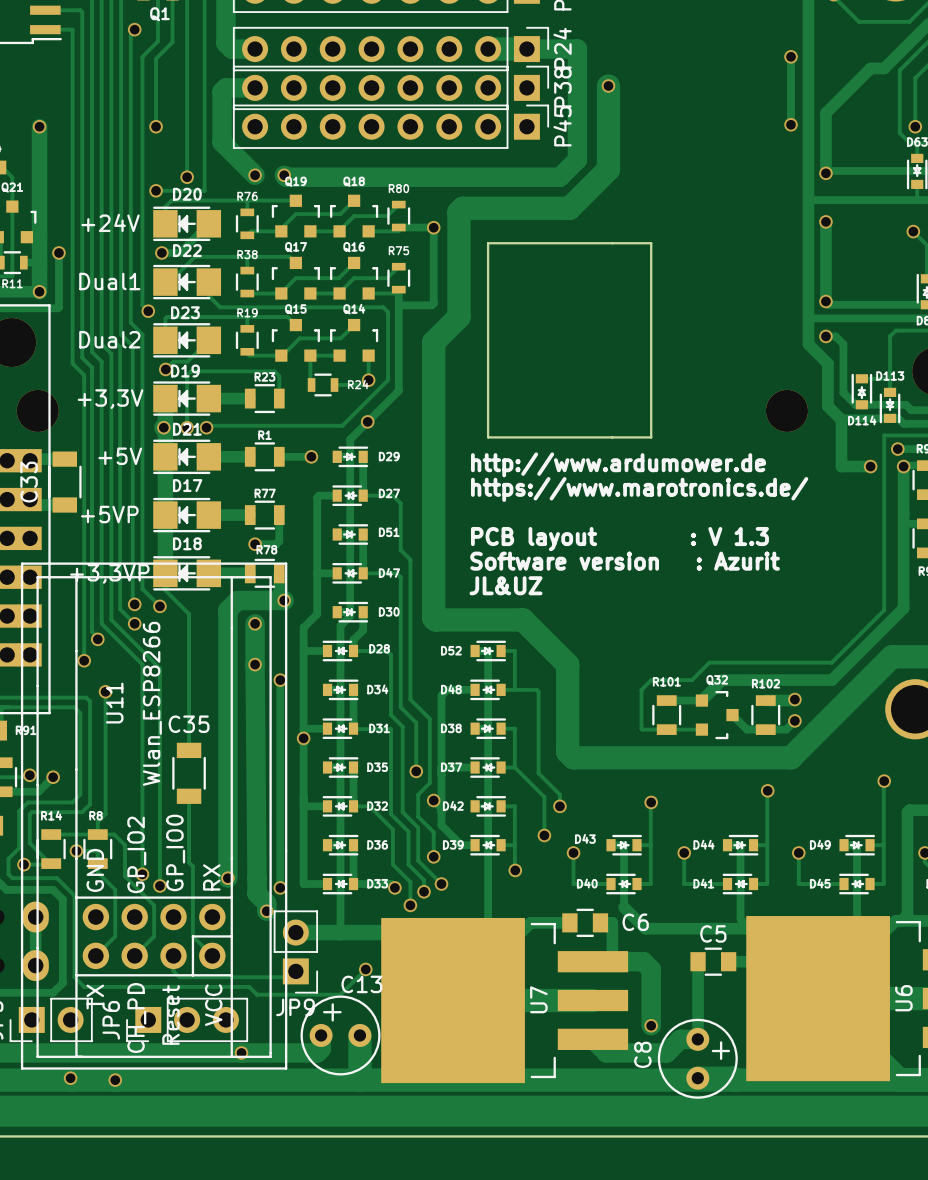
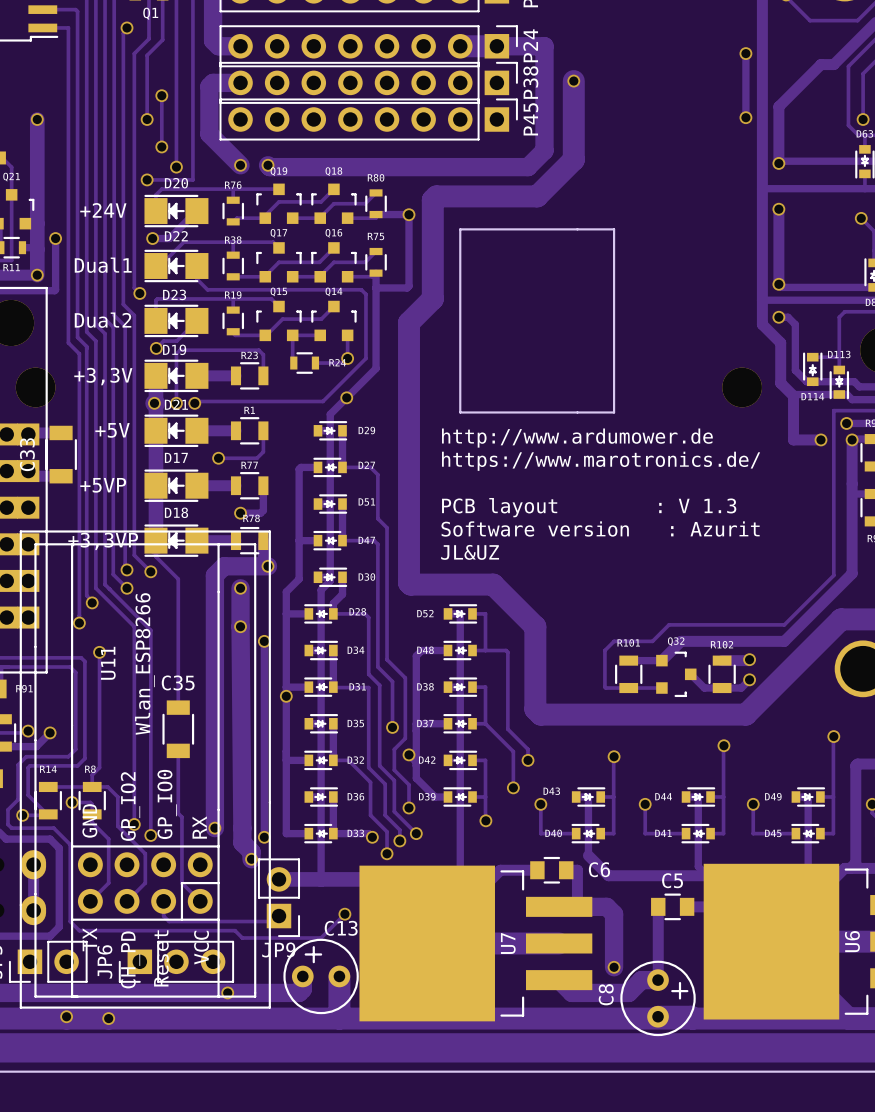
track: none -> (161, 95) (161, 146)
via: none -> (161, 95)
via: none -> (161, 146)
track: (279, 456) (311, 456) -> (263, 430) (263, 451) (257, 458) (218, 458)
via position: (311, 456) -> (218, 458)

